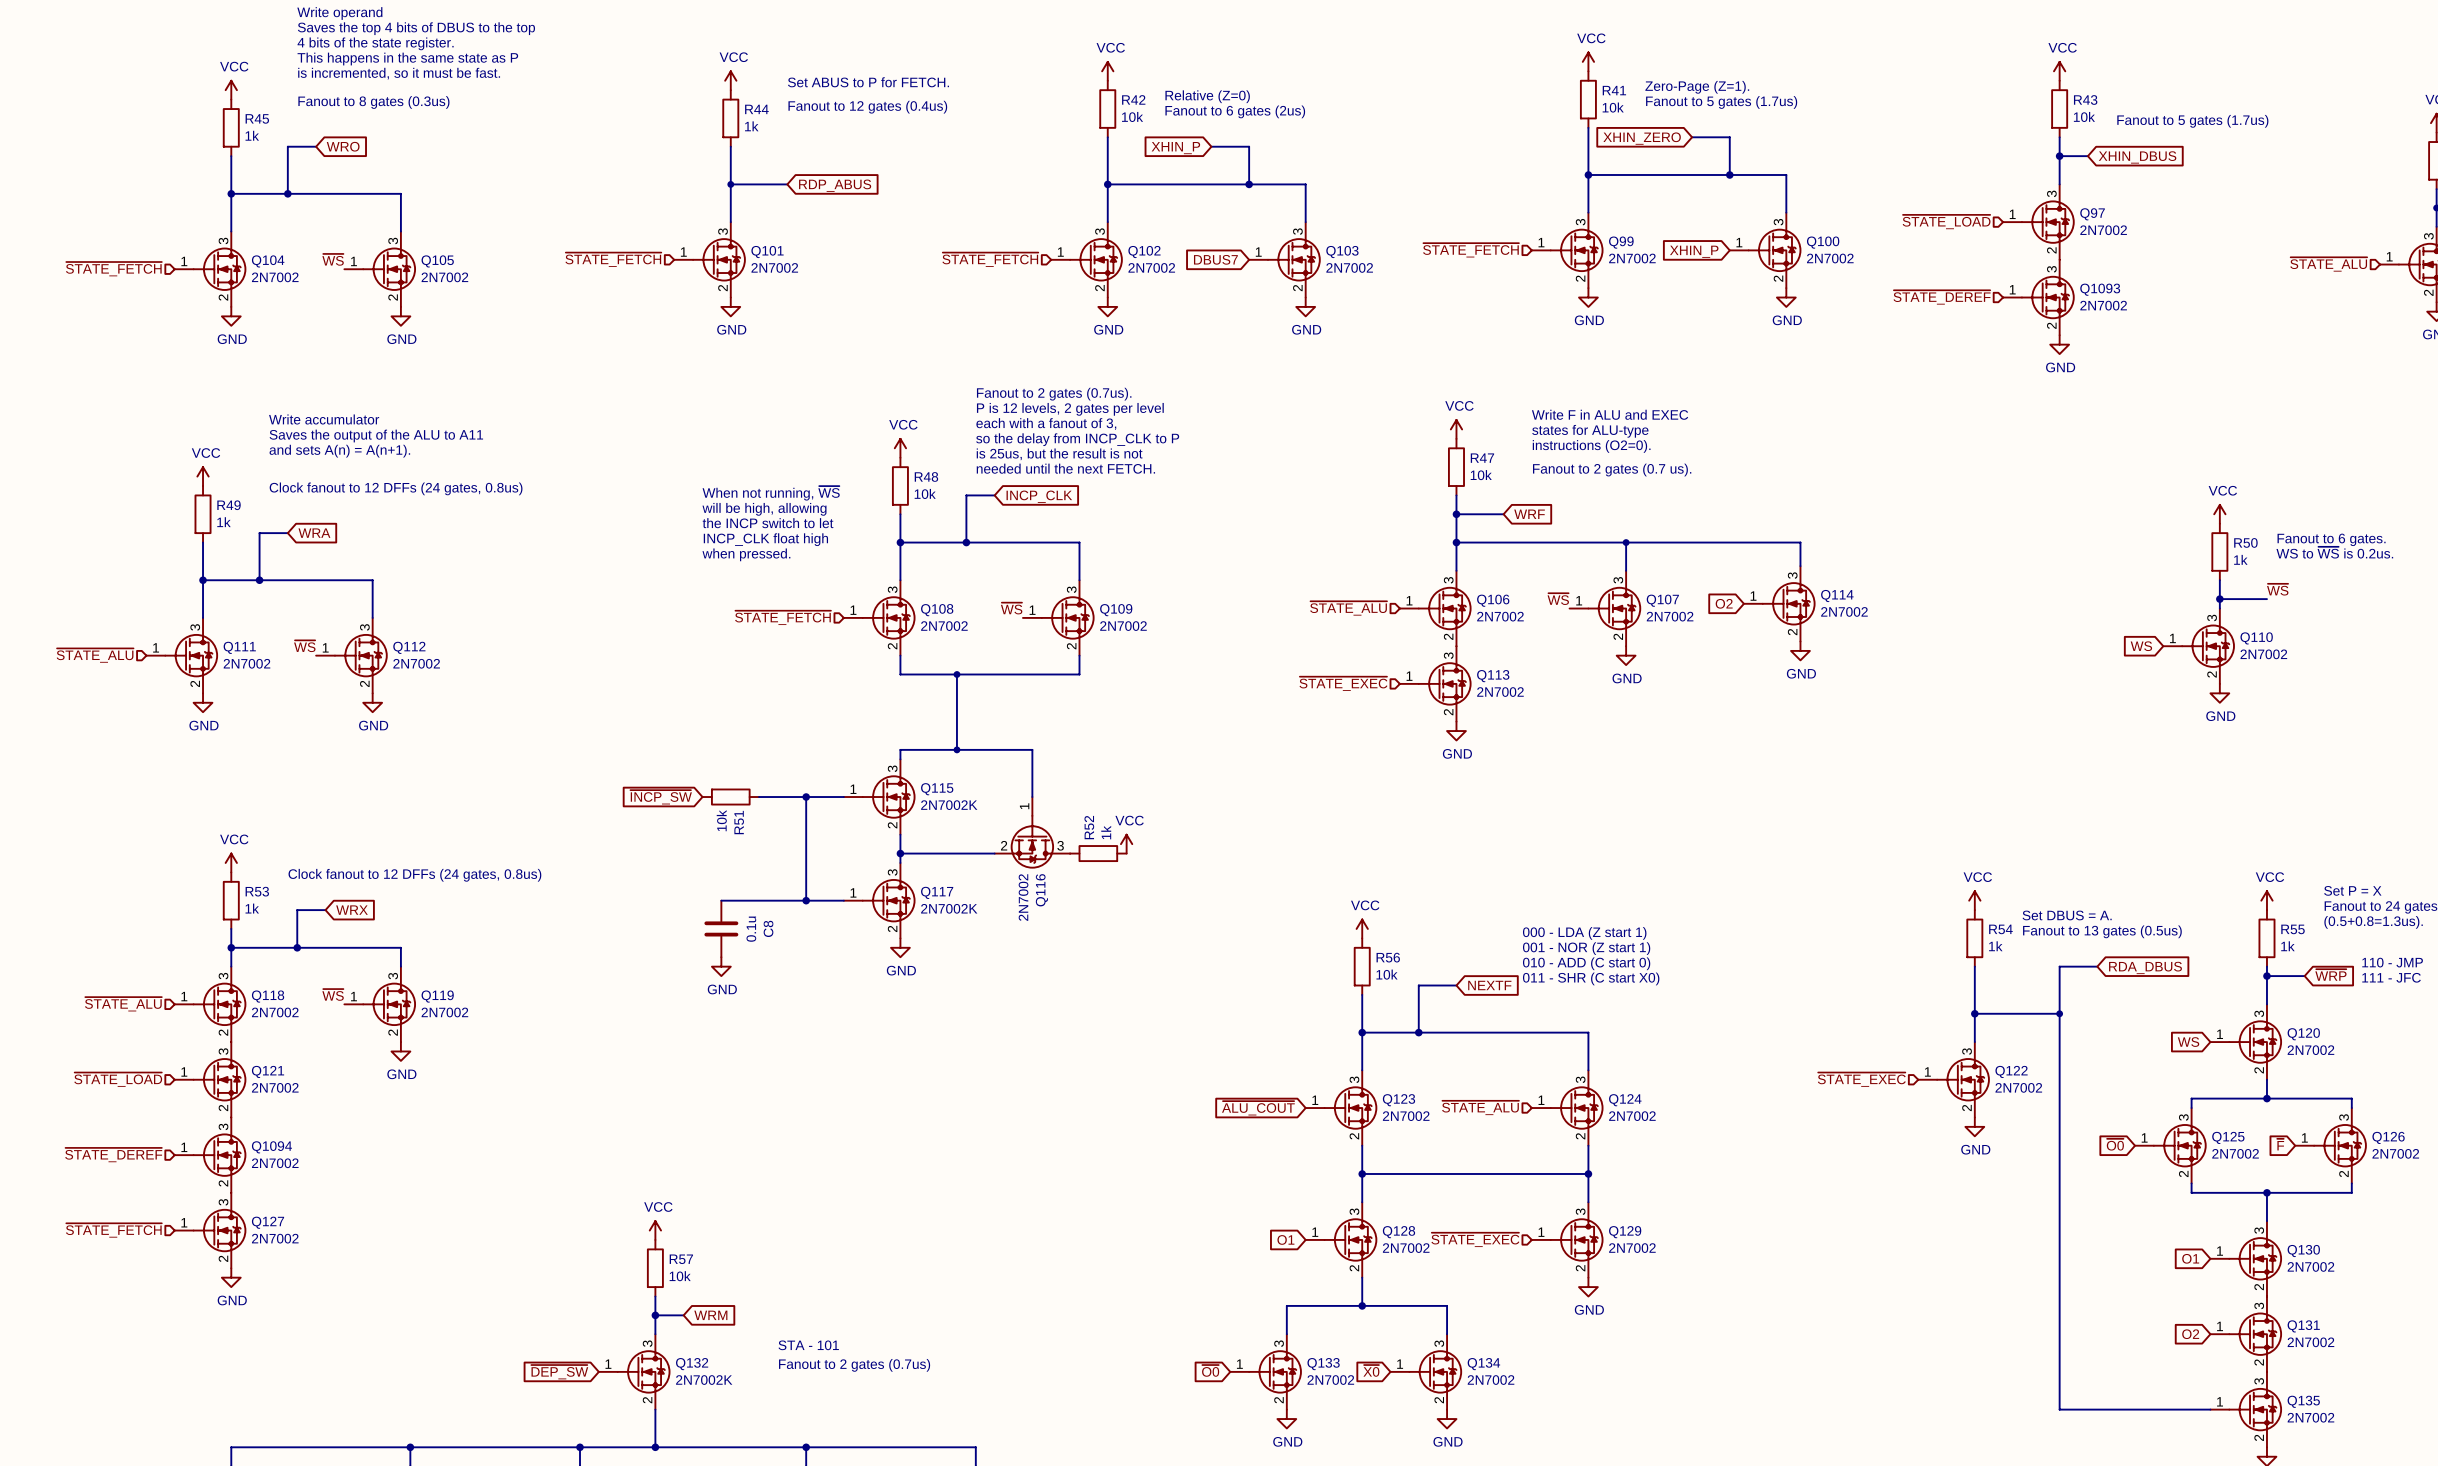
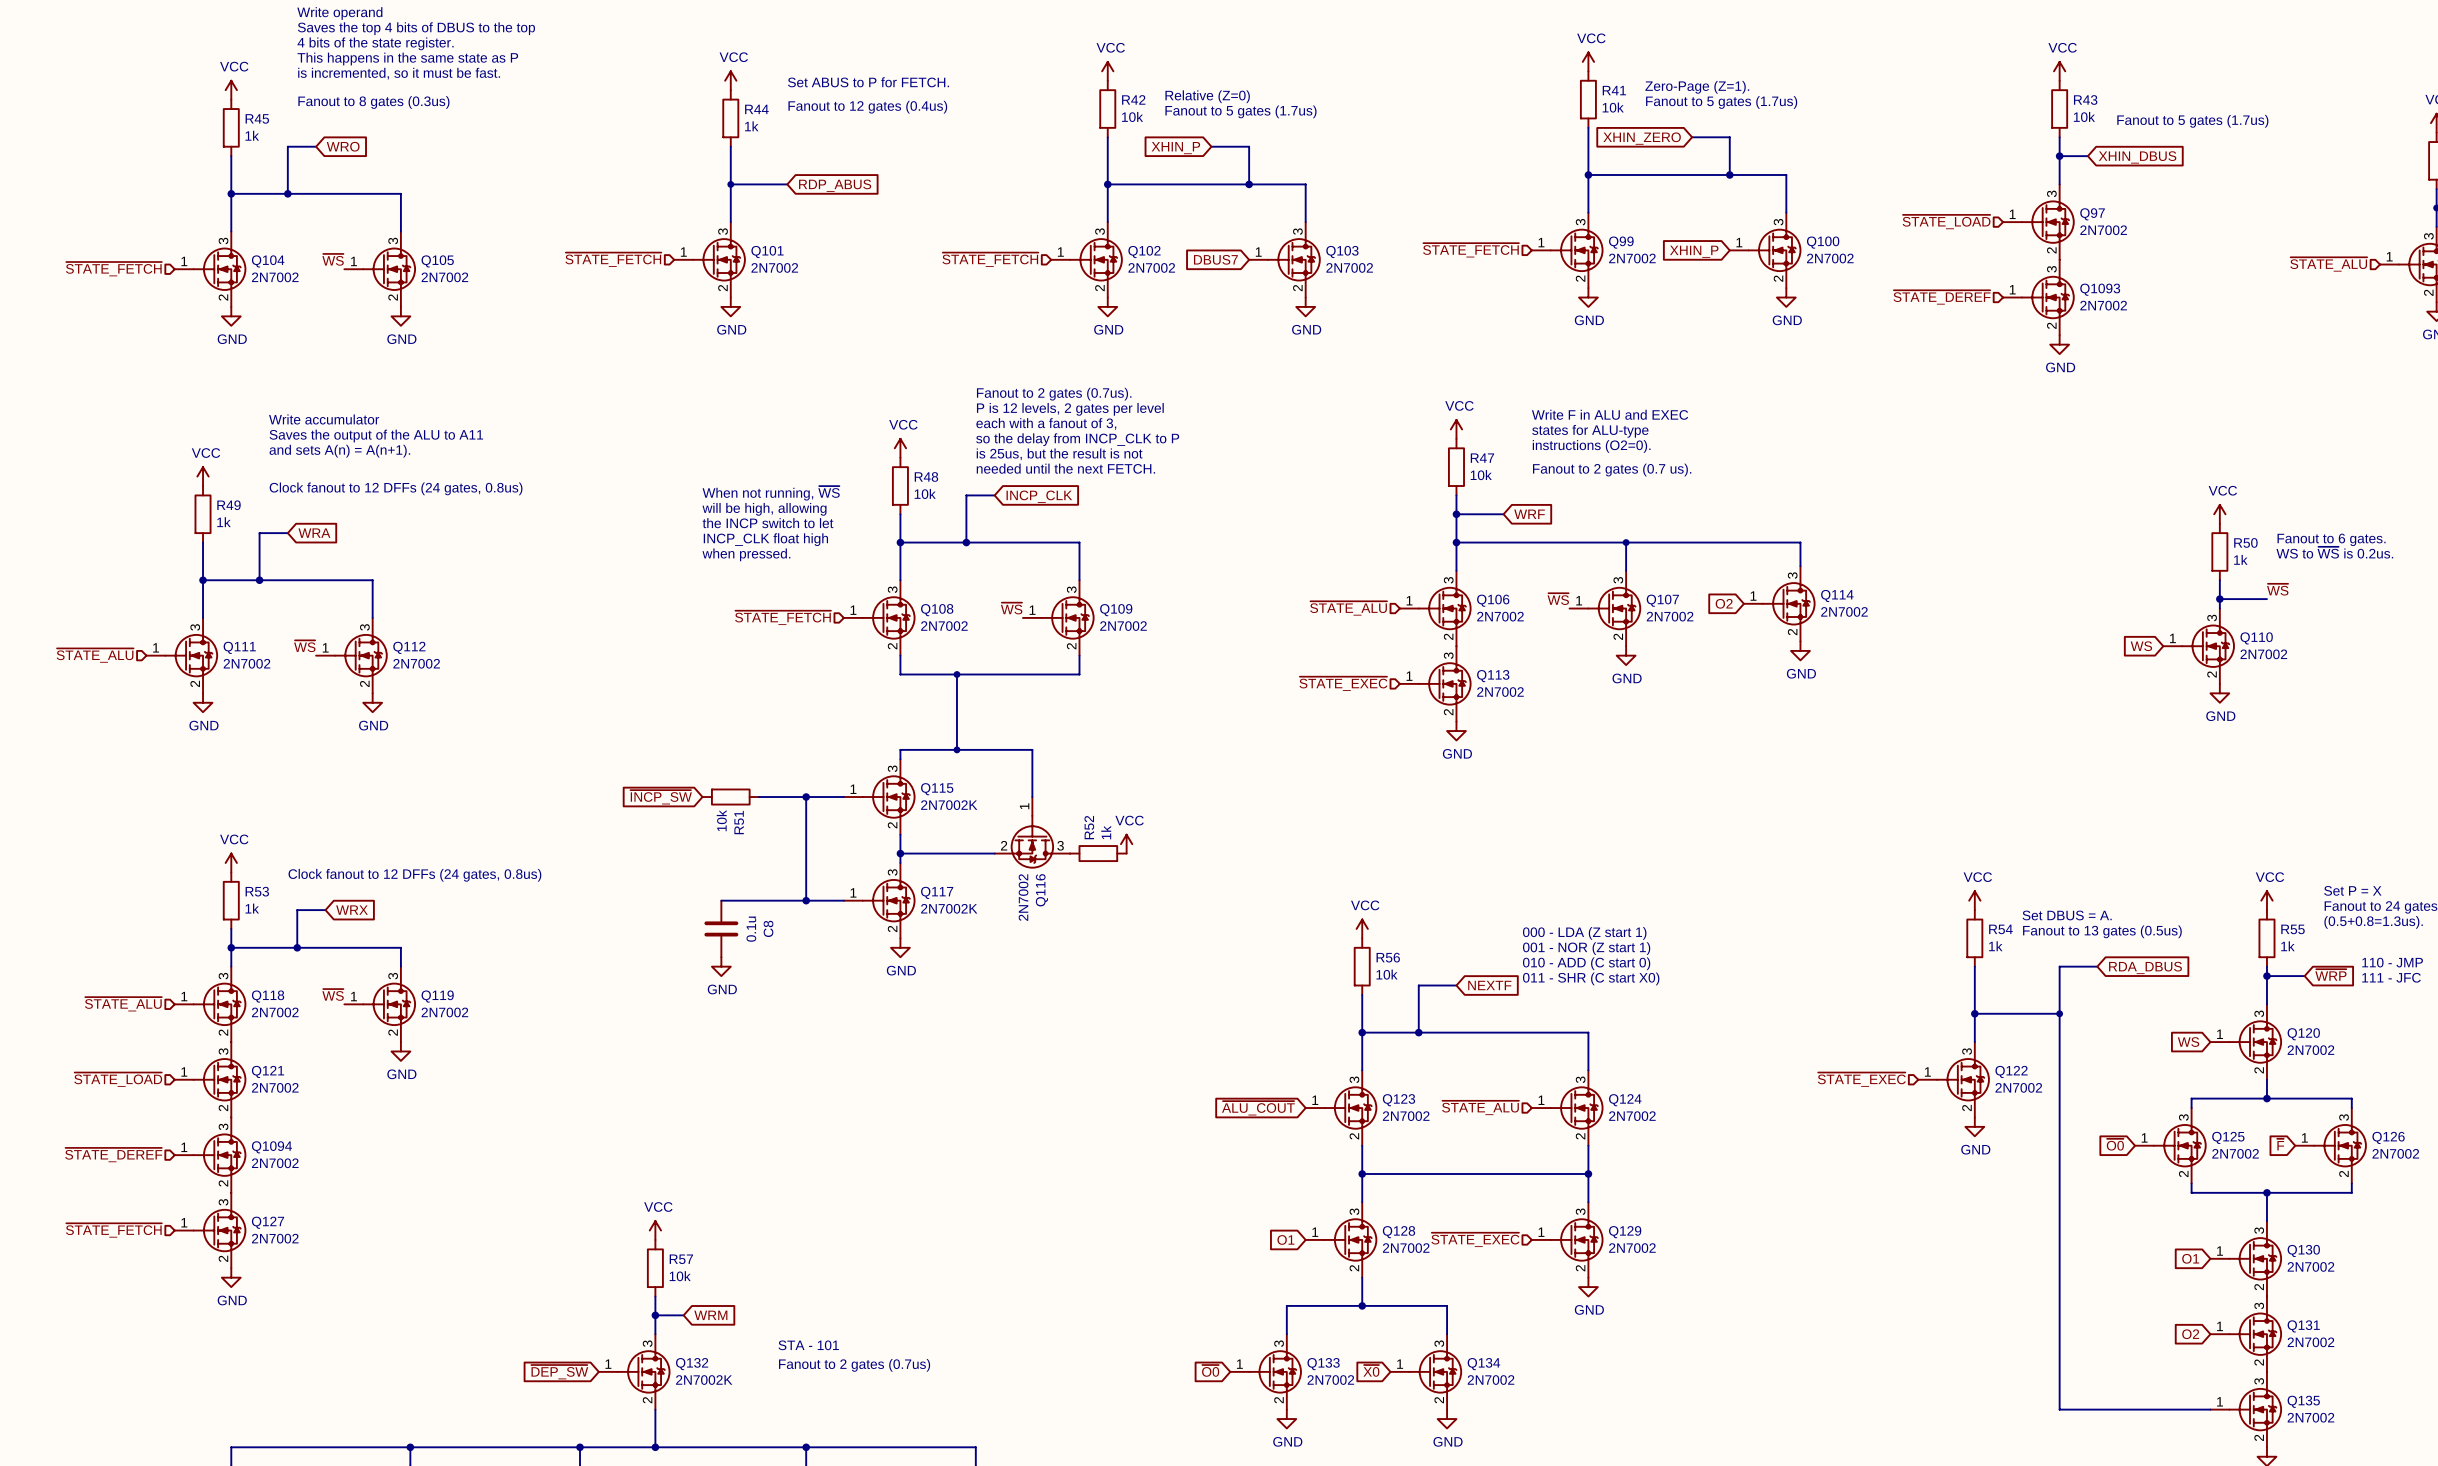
text: Fanout to 6 gates (2us) (1235, 111) -> Fanout to 5 gates (1.7us) (1240, 111)

